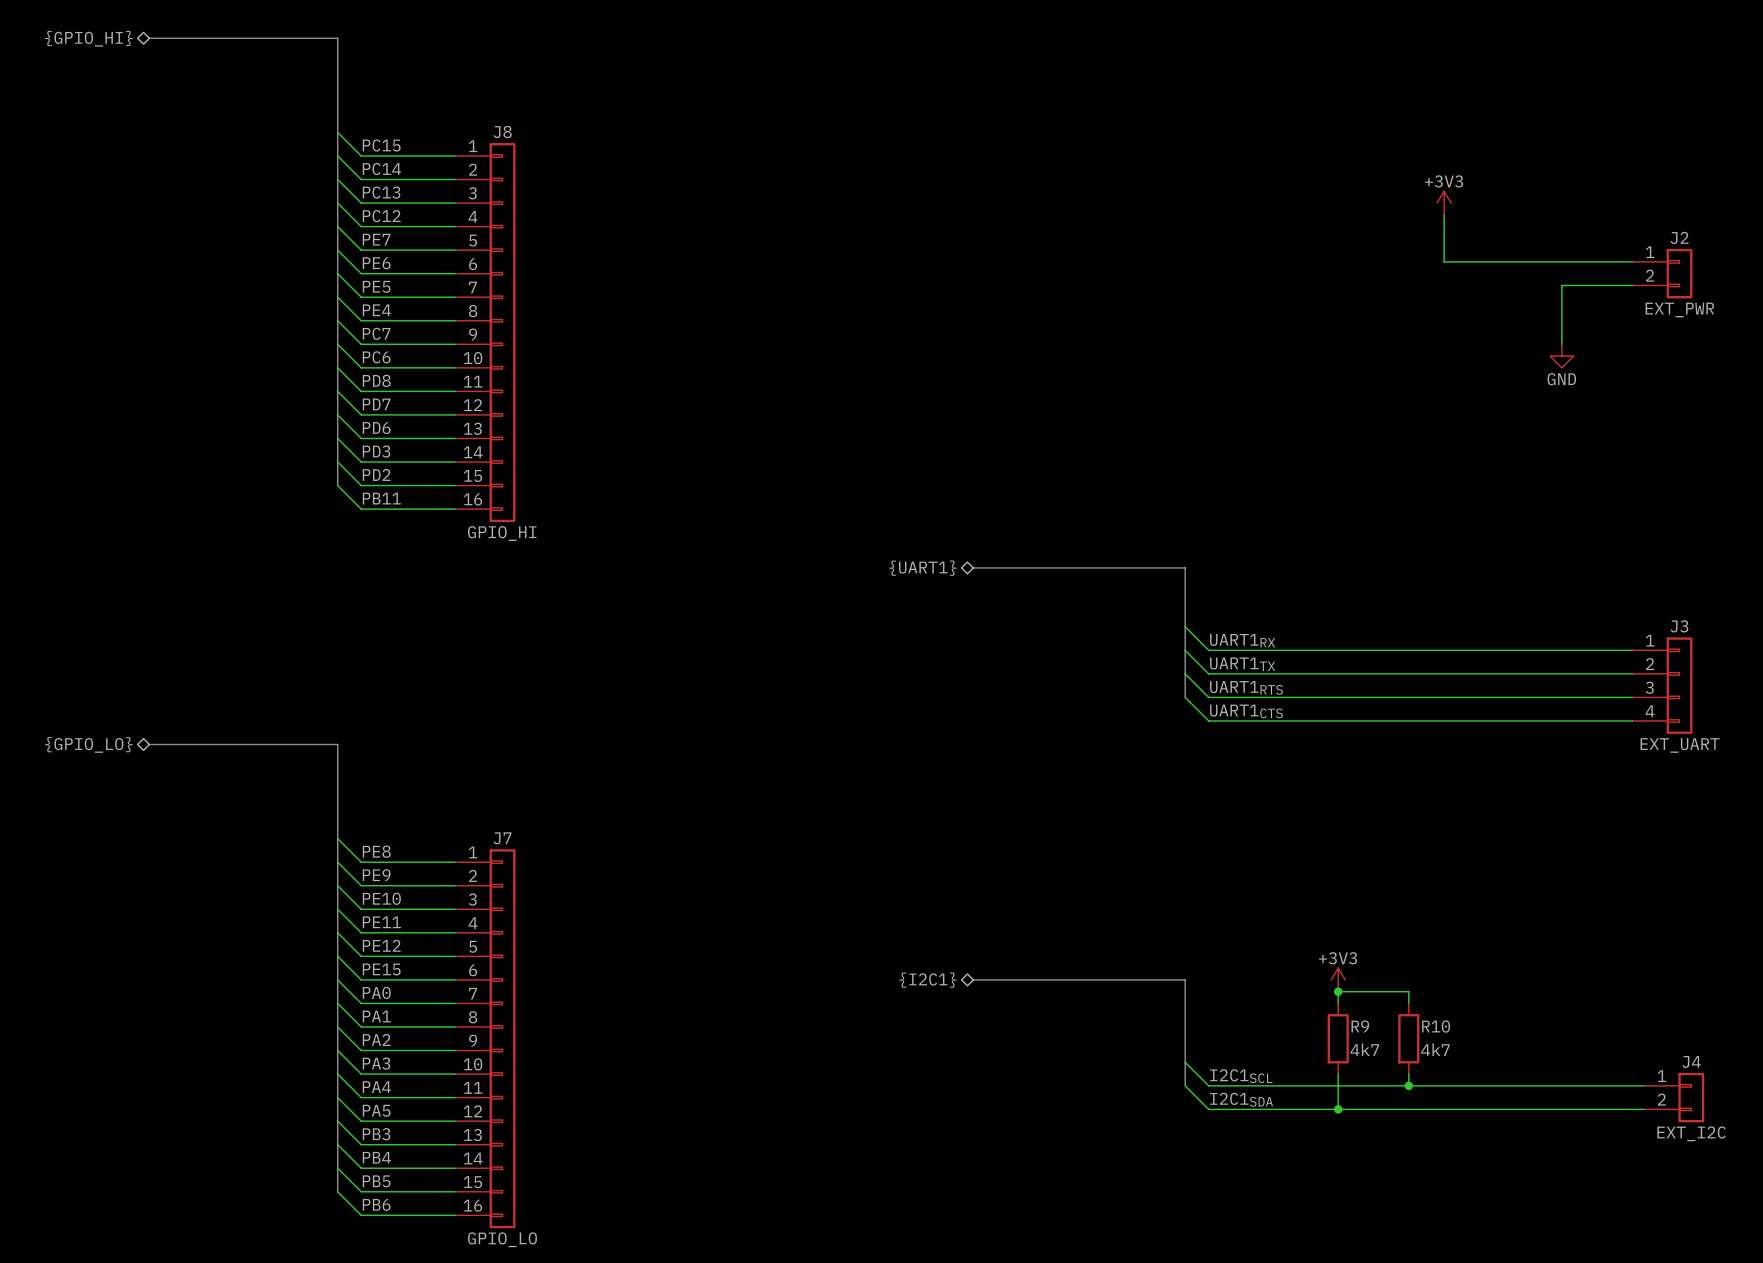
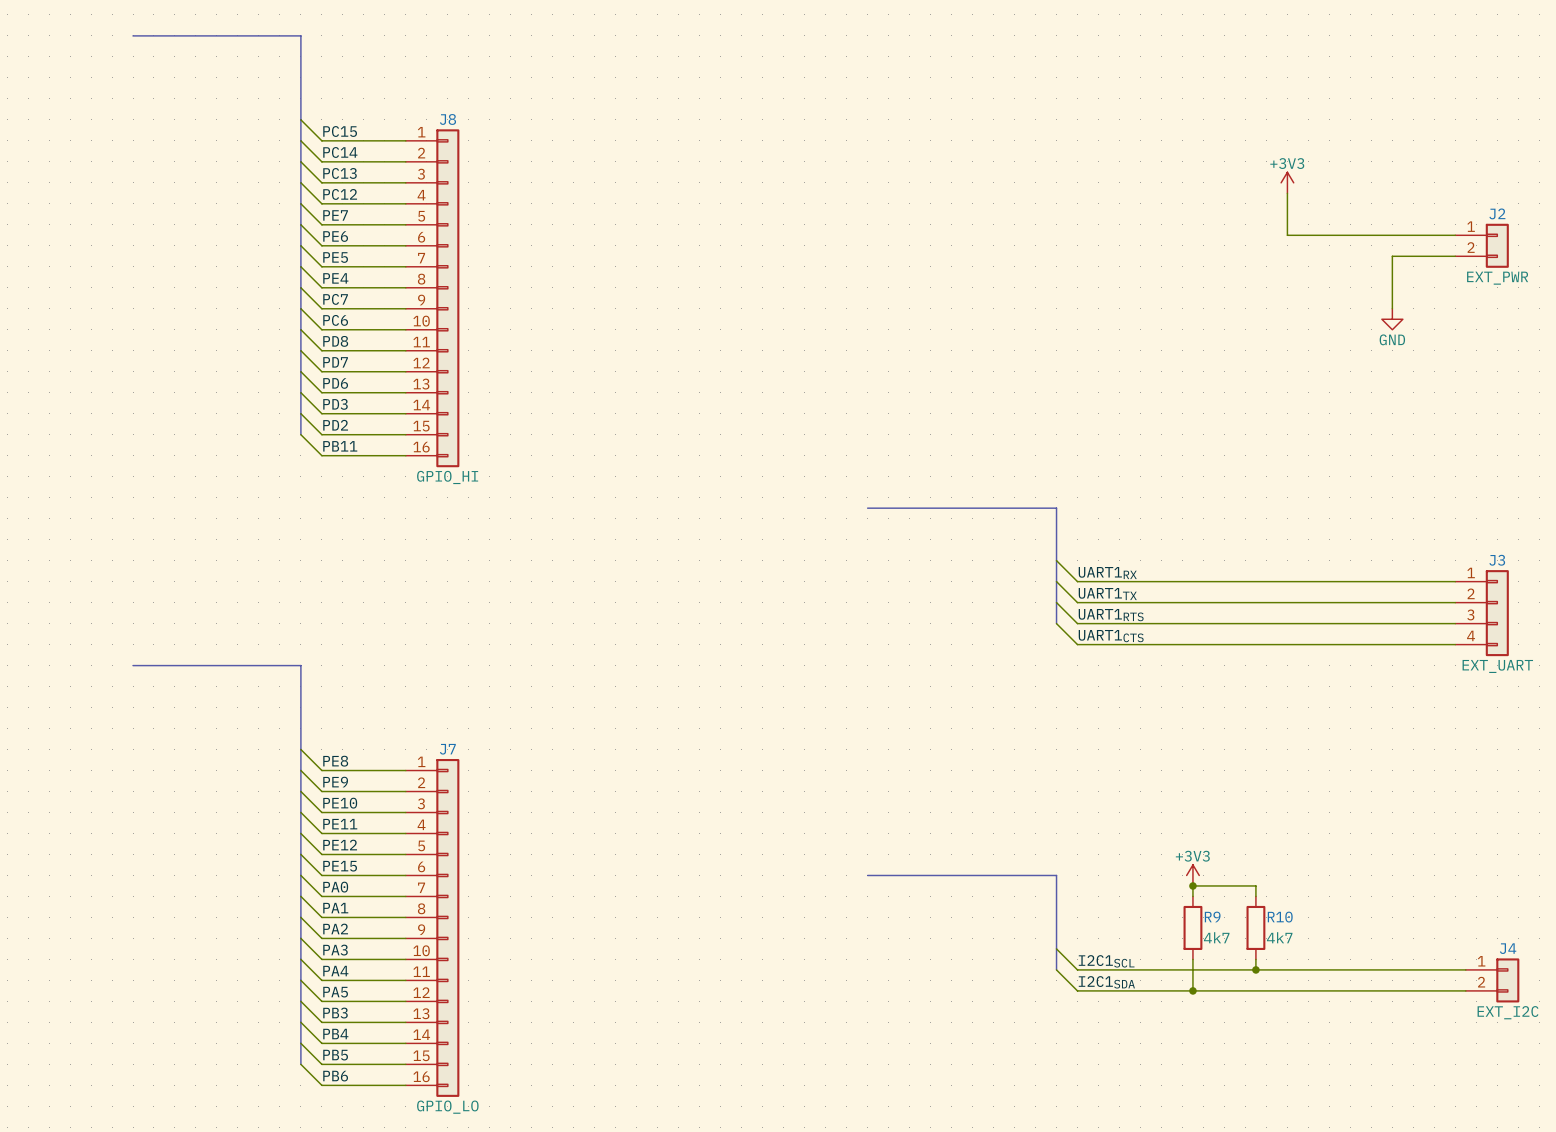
hierarchical label: {GPIO_HI} (88, 38) -> none
hierarchical label: {UART1} (922, 568) -> none
hierarchical label: {GPIO_LO} (88, 744) -> none
hierarchical label: {I2C1} (928, 980) -> none

